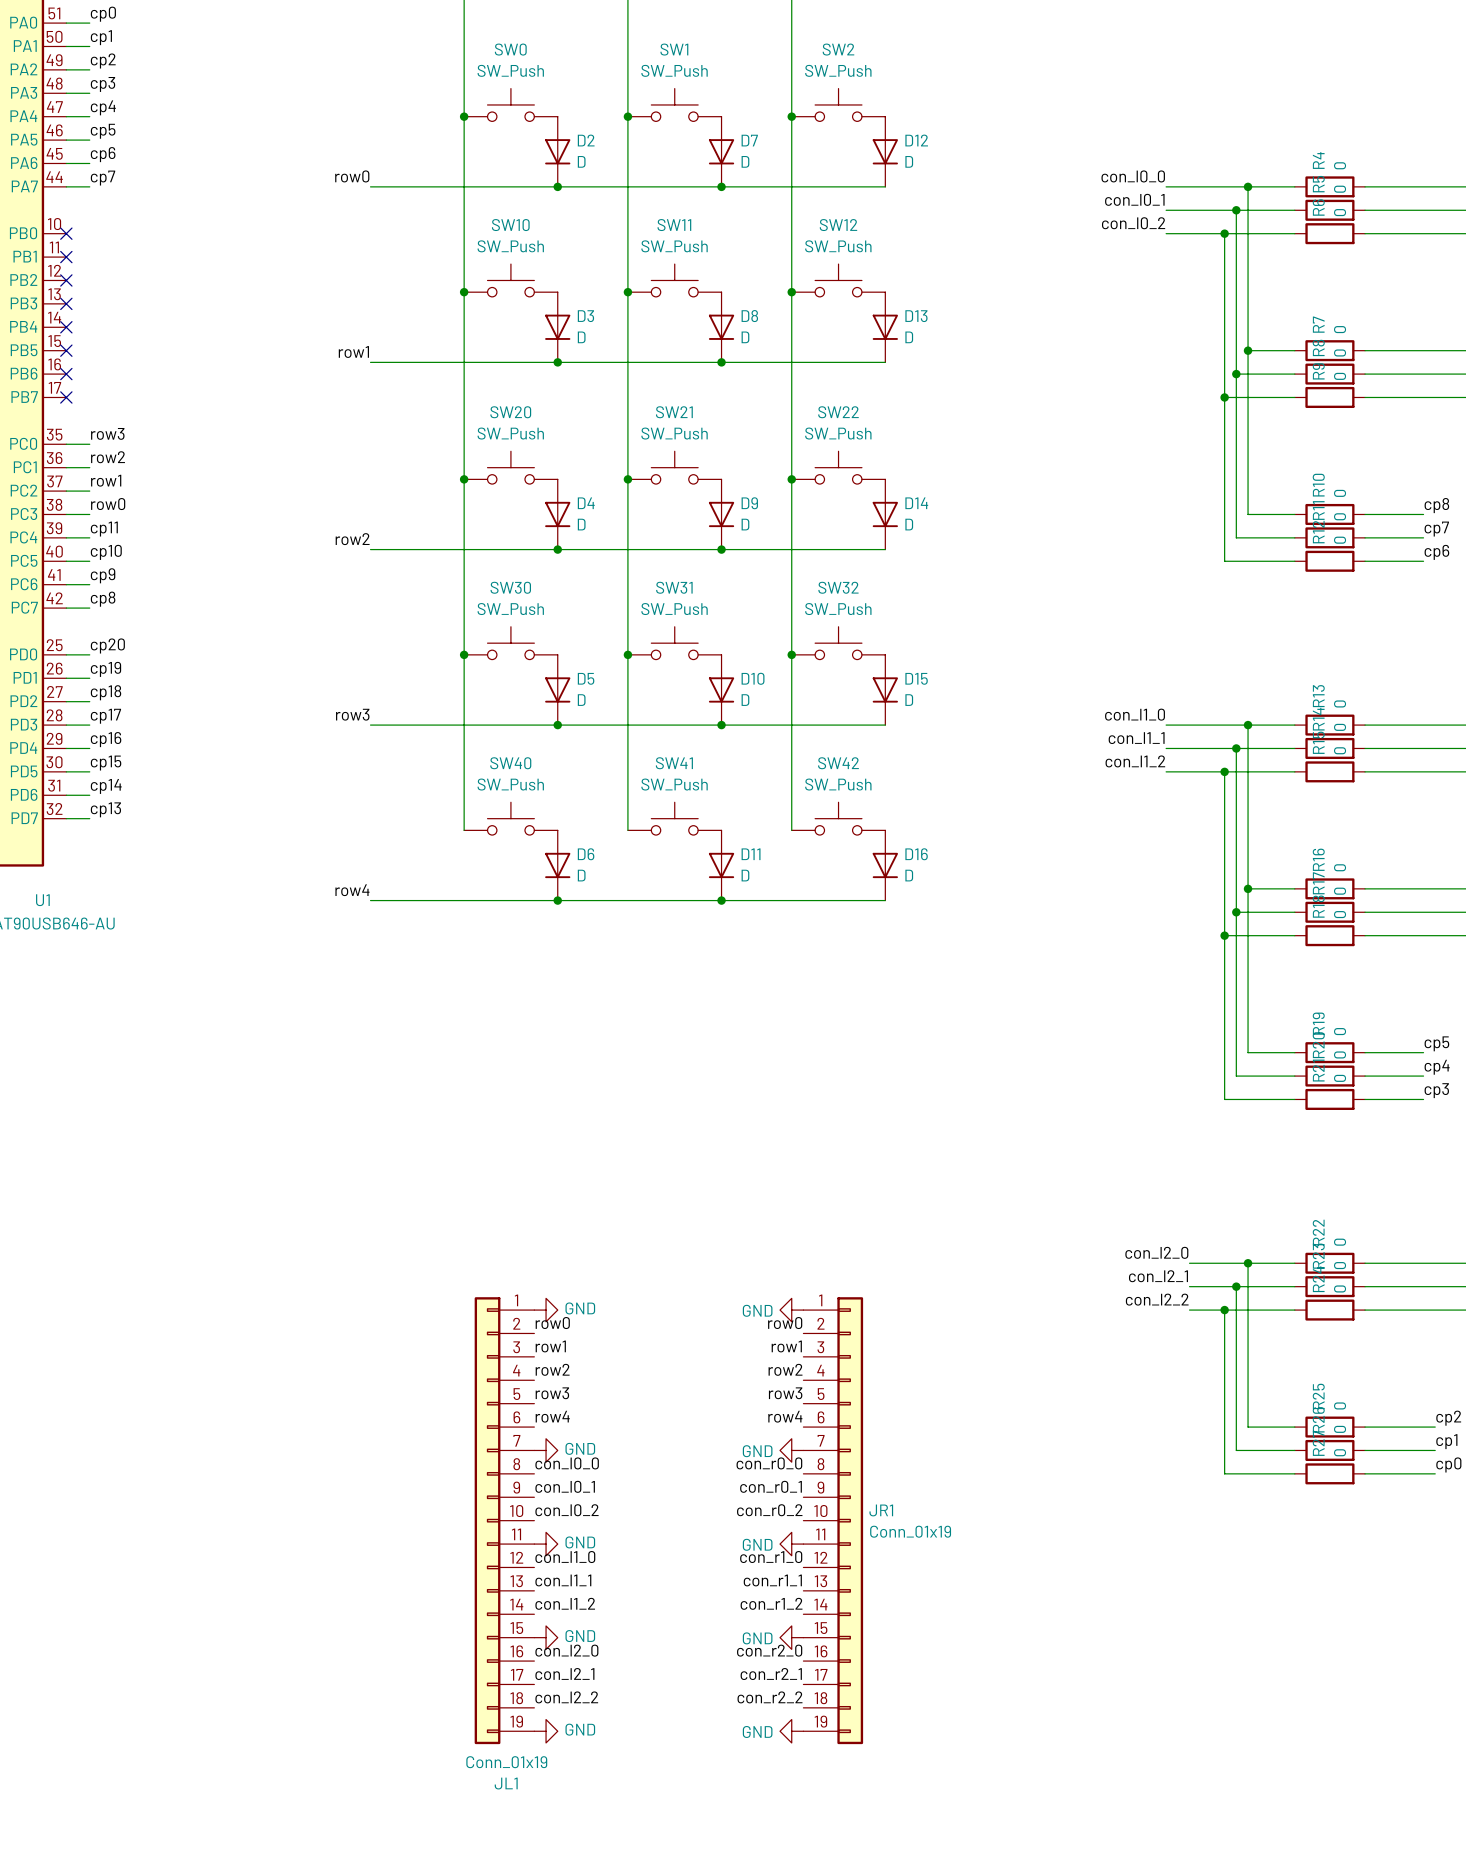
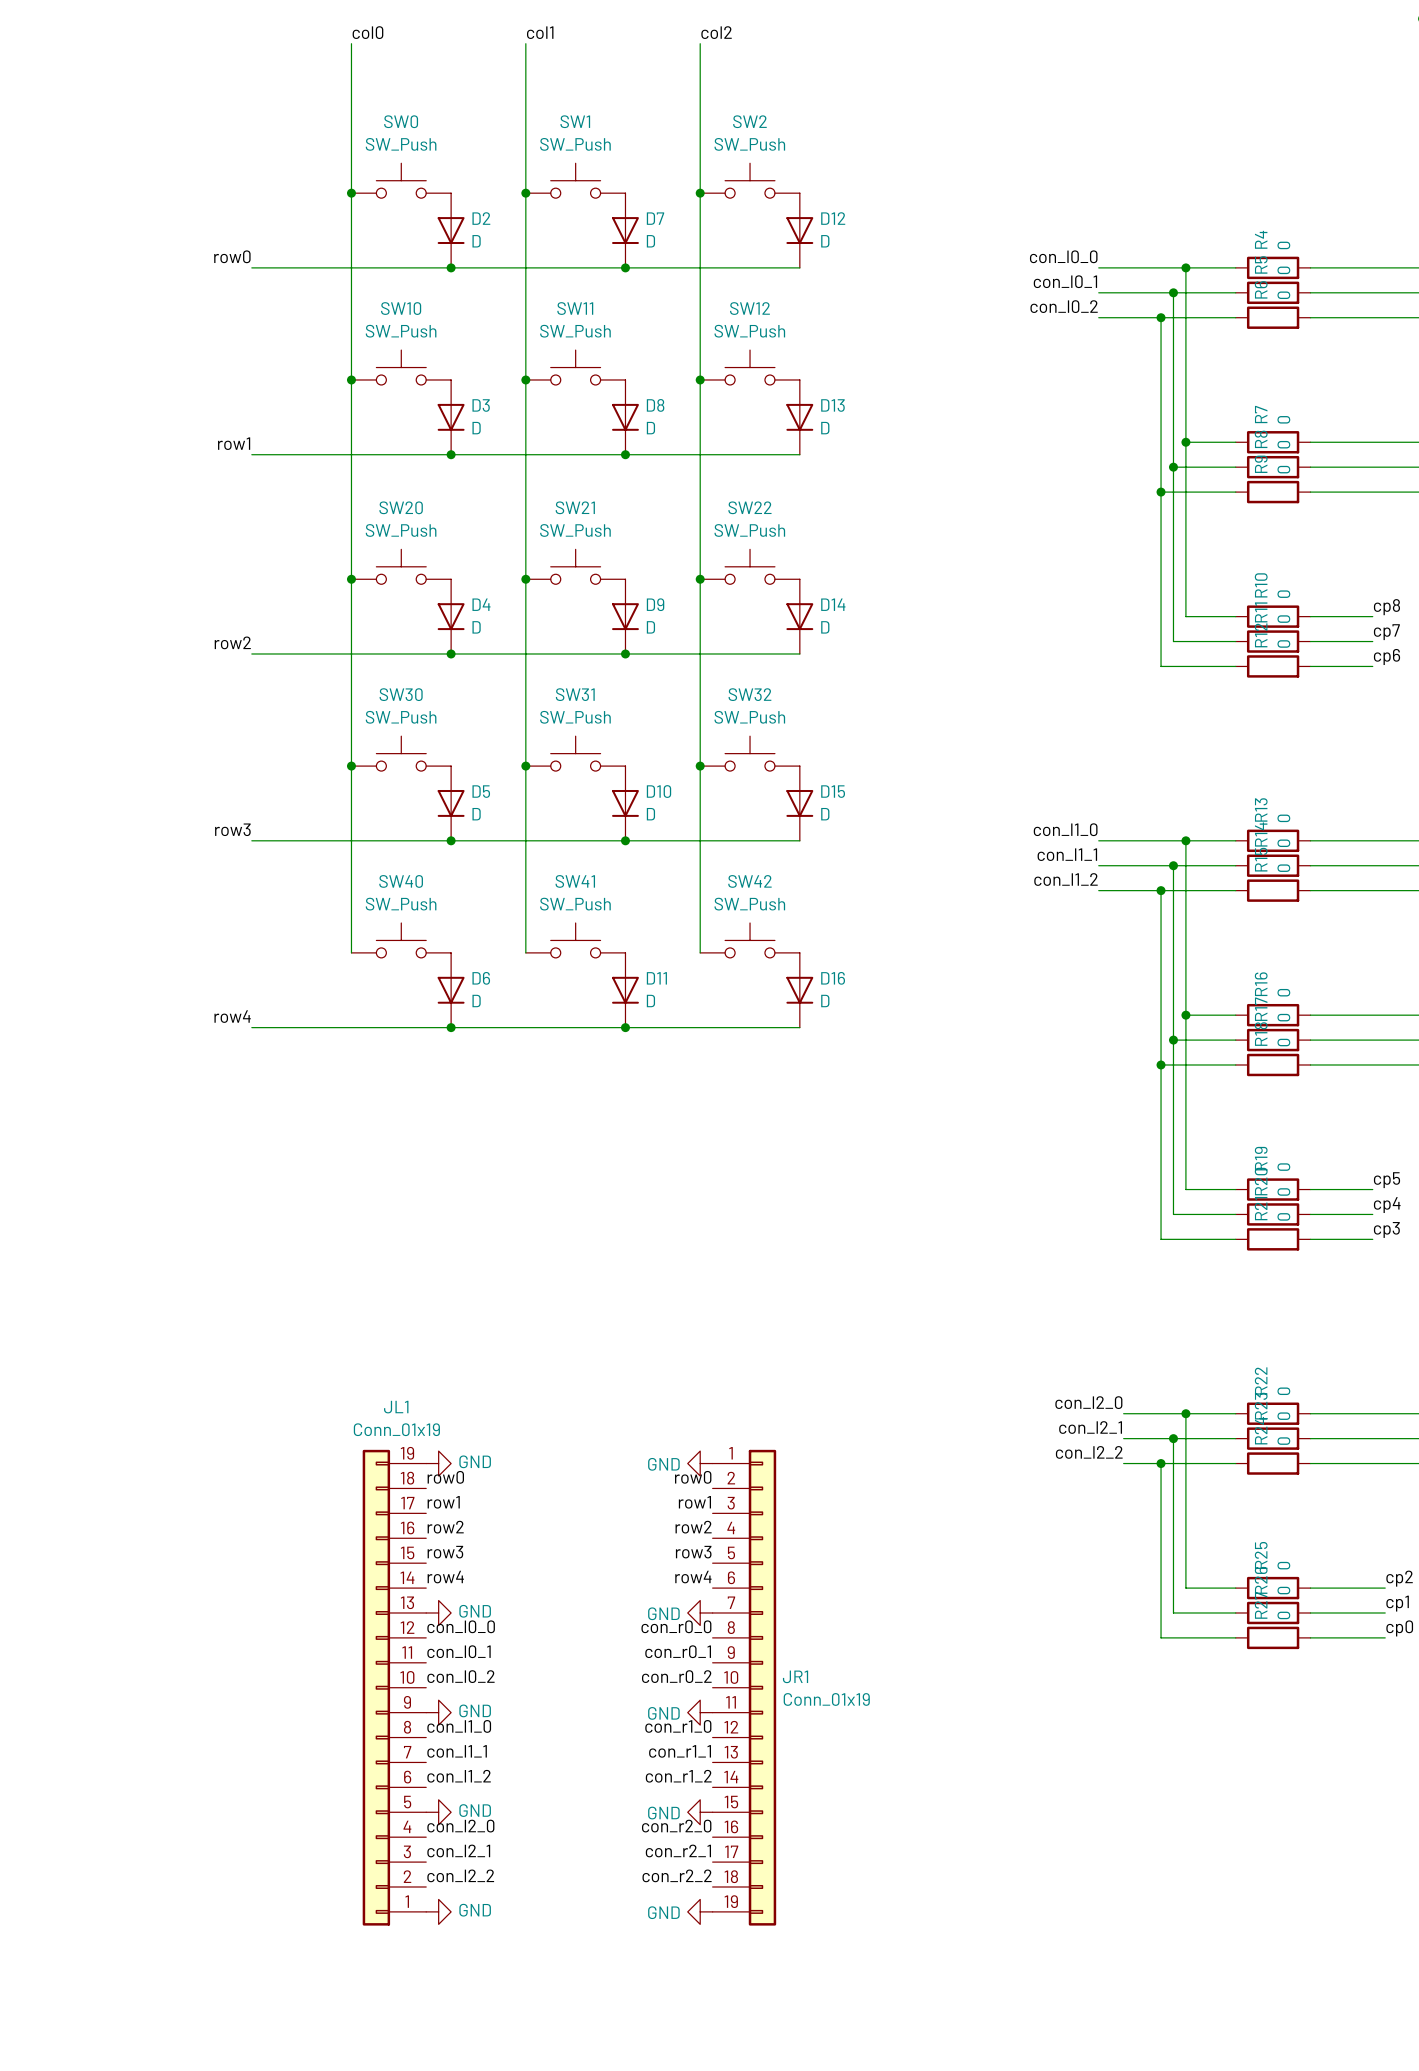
JL1 flip: as is (487, 1520) -> up-down (376, 1687)

